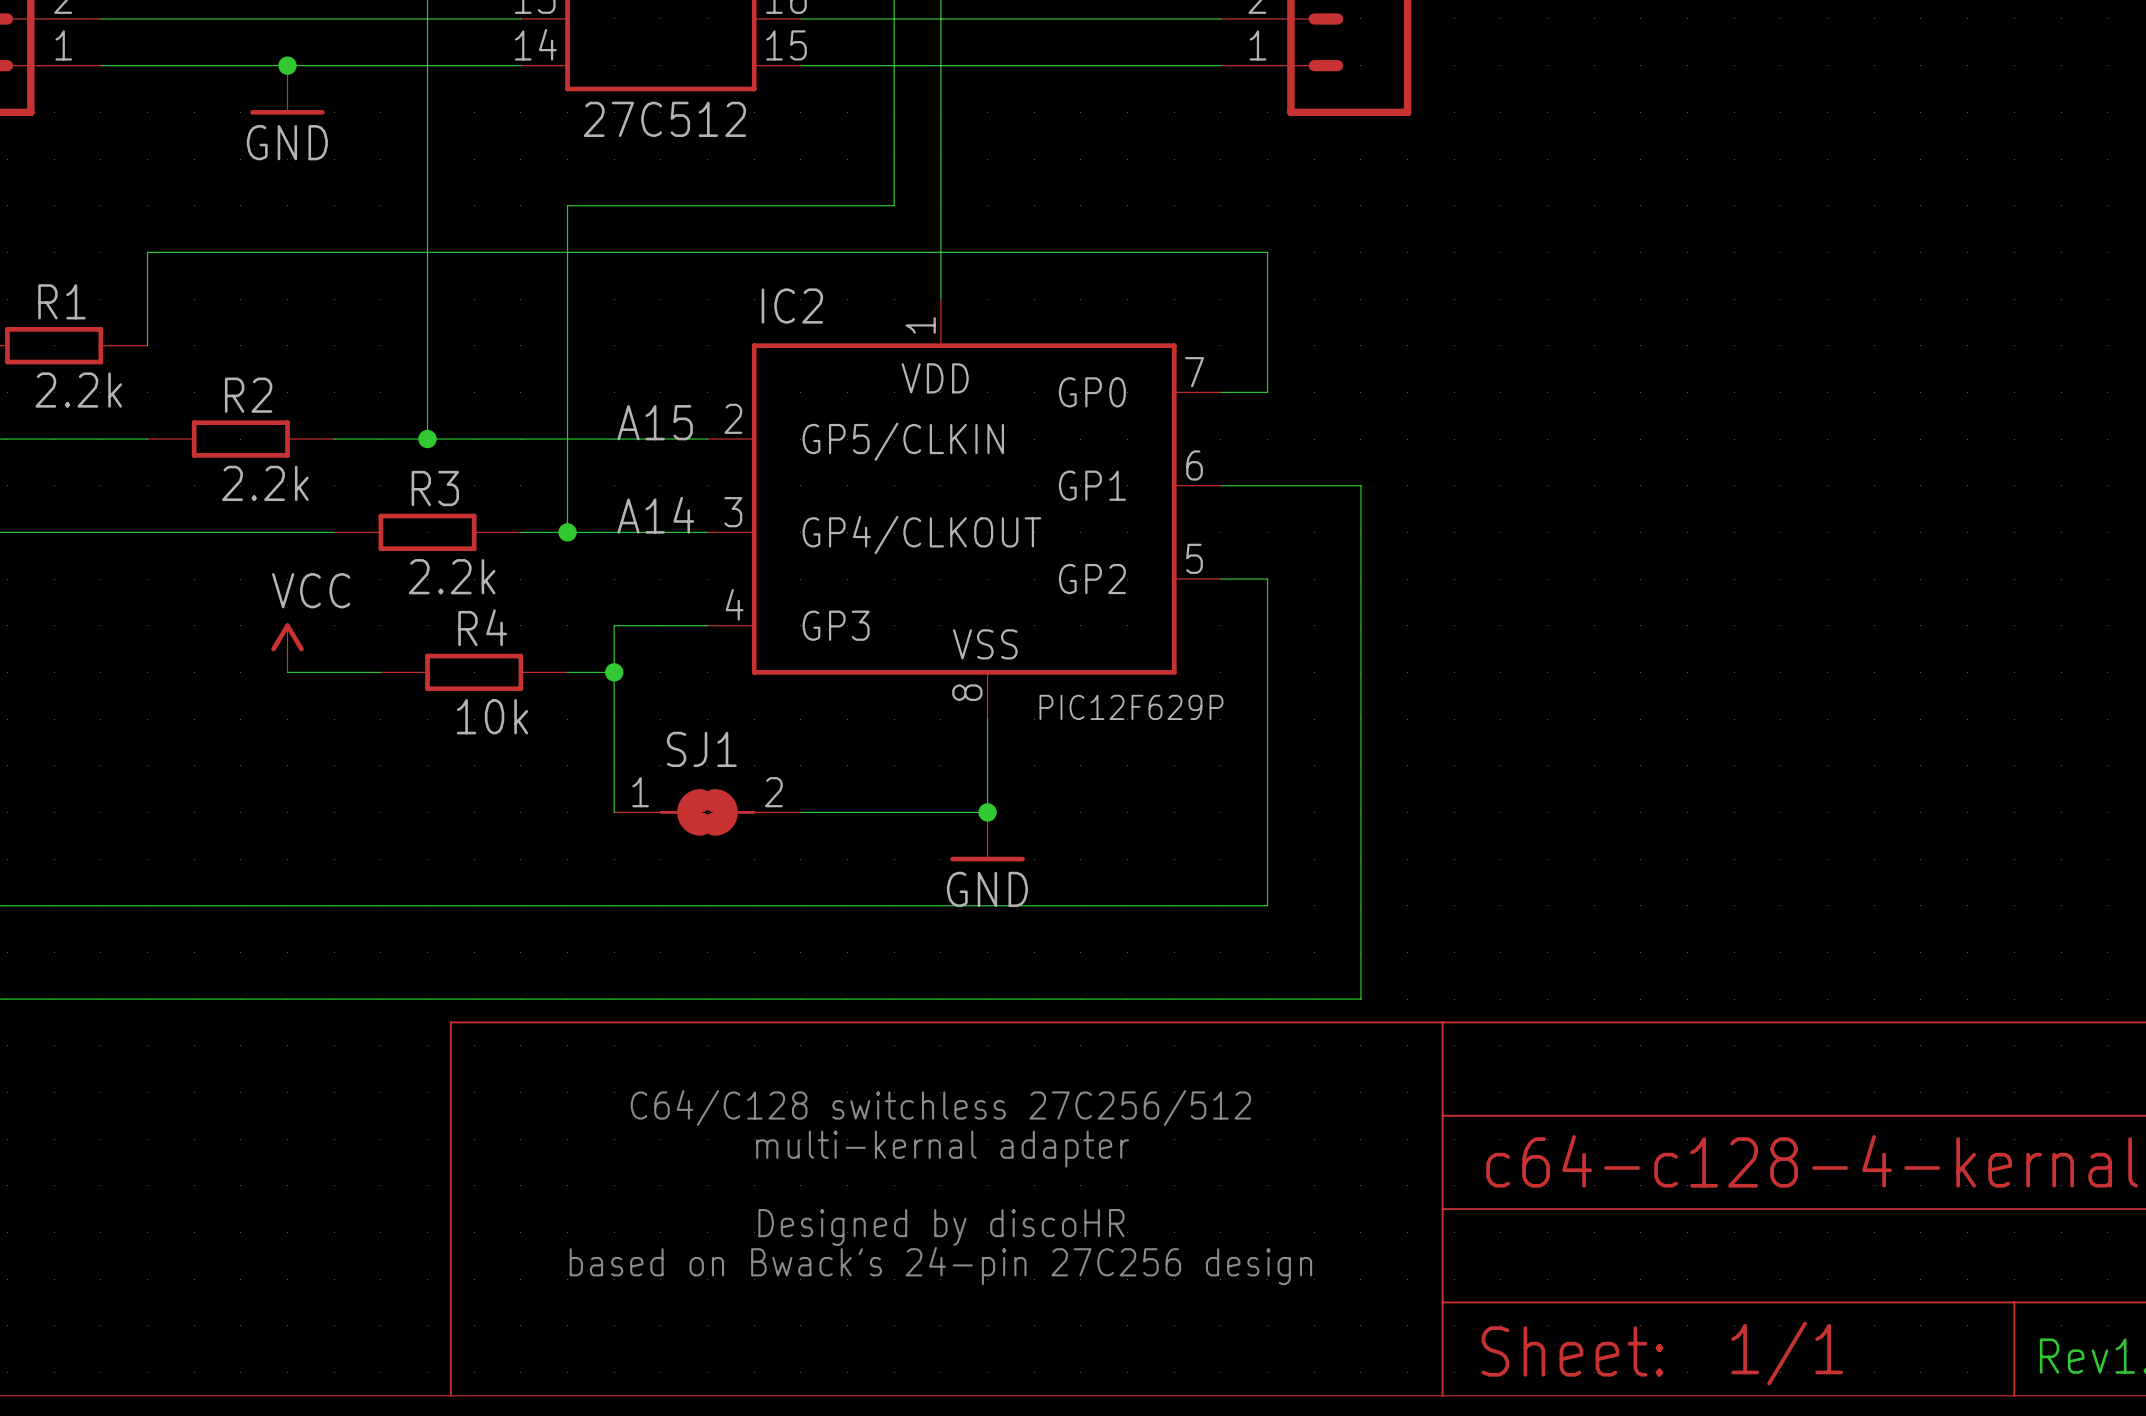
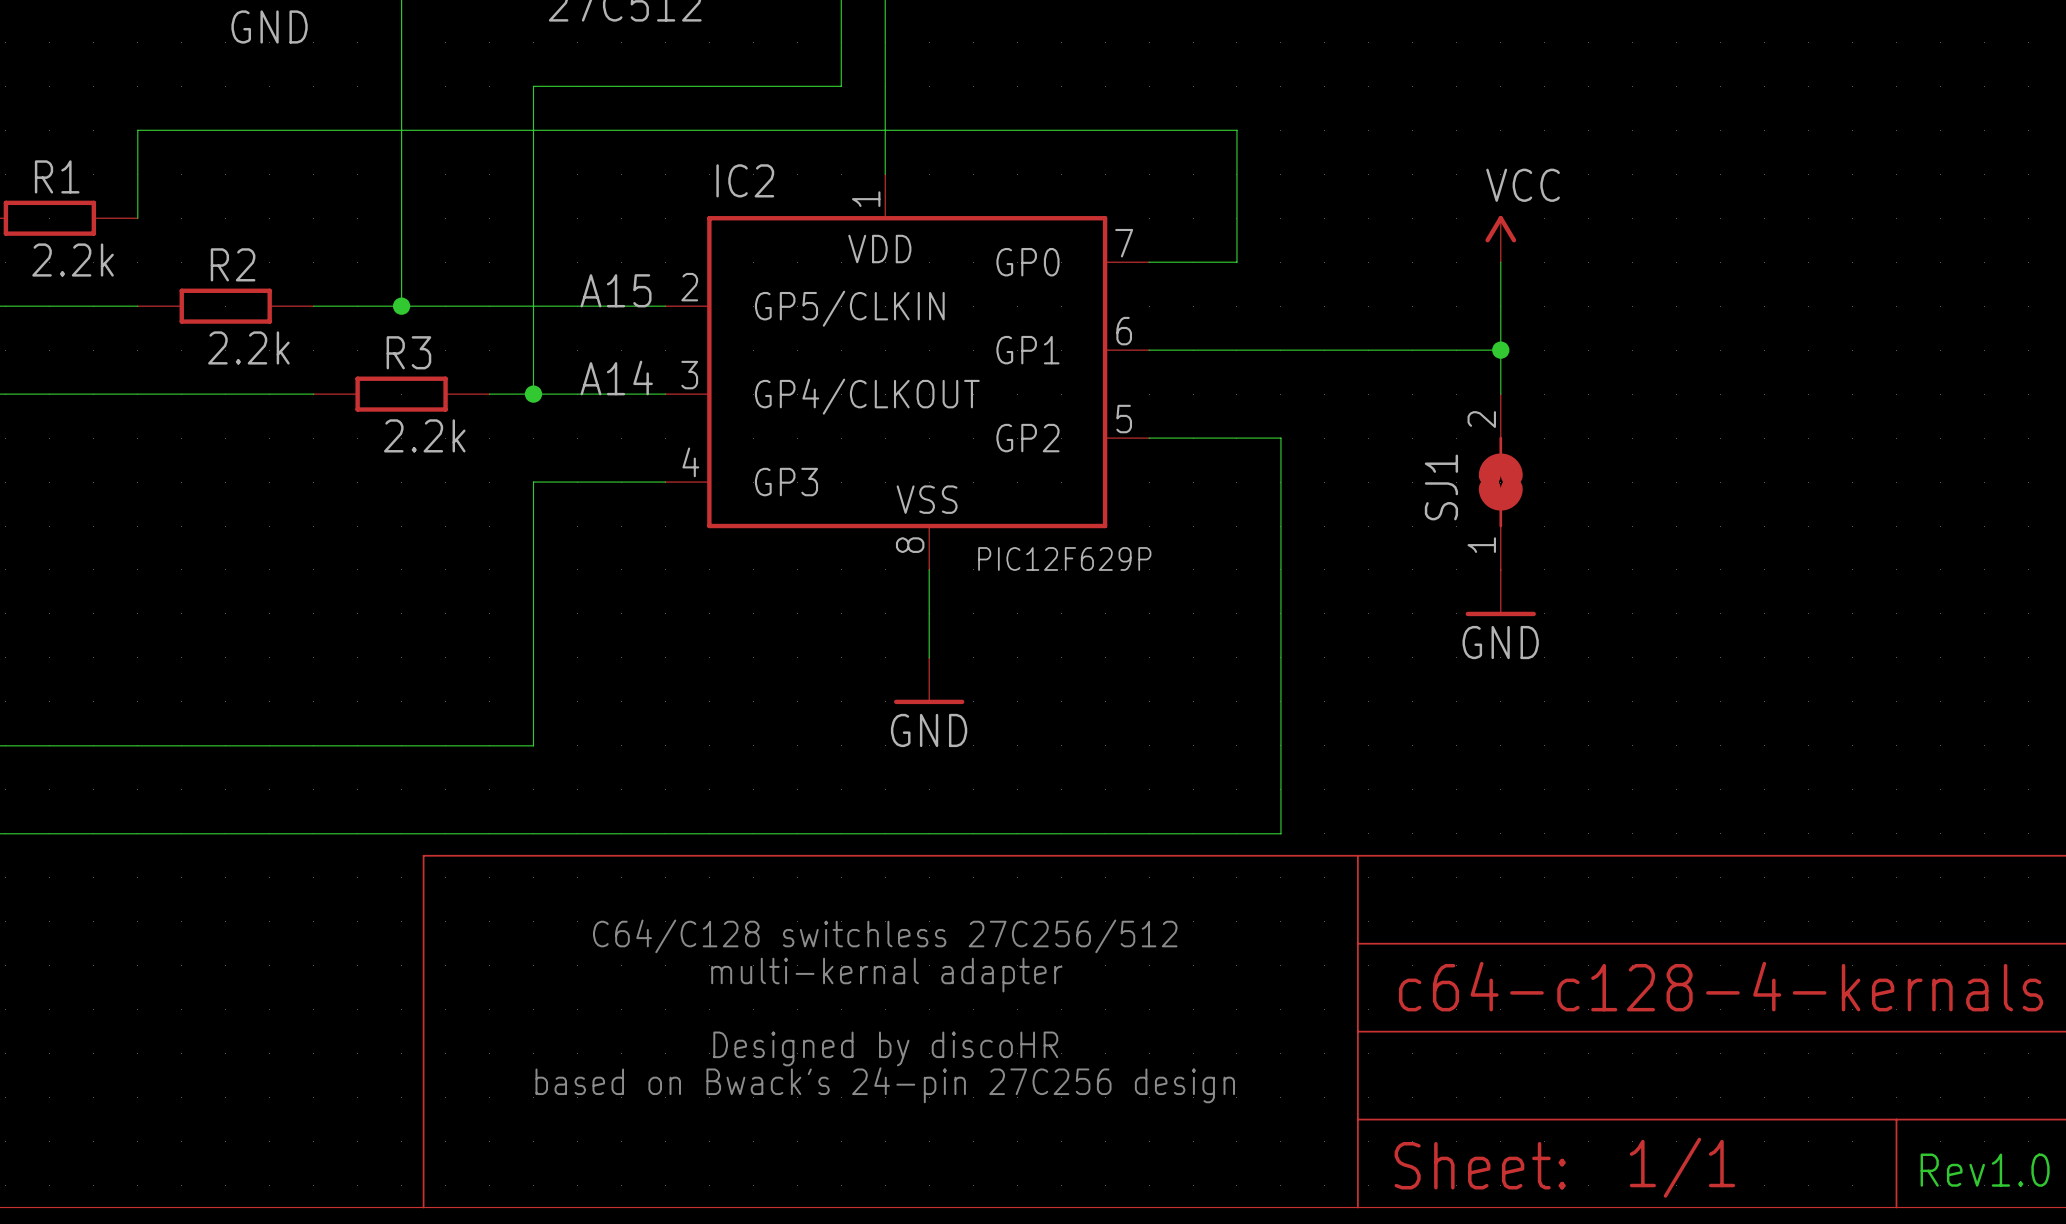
wire: (1267, 252) (1267, 392) -> (1193, 130) (1236, 130) (1236, 262) (1193, 262)
power symbol: none -> VCC (1500, 239)
wire: none -> (1500, 262) (1500, 394)
wire: (1360, 485) (1360, 579) -> (1193, 438) (1280, 438)
wire: none -> (1280, 350) (1500, 350)
junction: none -> (1500, 350)
wire: (1267, 579) (1267, 905) (567, 905) -> none
wire: (614, 625) (614, 812) -> (577, 482) (533, 482) (533, 745)
power symbol: VCC (287, 647) -> none
wire: (287, 672) (380, 672) -> none
R4: 10k (474, 672) -> none
wire: (567, 672) (614, 672) -> none
junction: (614, 672) -> none
power symbol: none -> GND (1500, 593)
SJ1 rotation: 0° (707, 812) -> 90° counterclockwise (1500, 482)
SJ1 position: (707, 812) -> (1500, 482)
wire: (800, 812) (987, 812) -> none
junction: (987, 812) -> none

